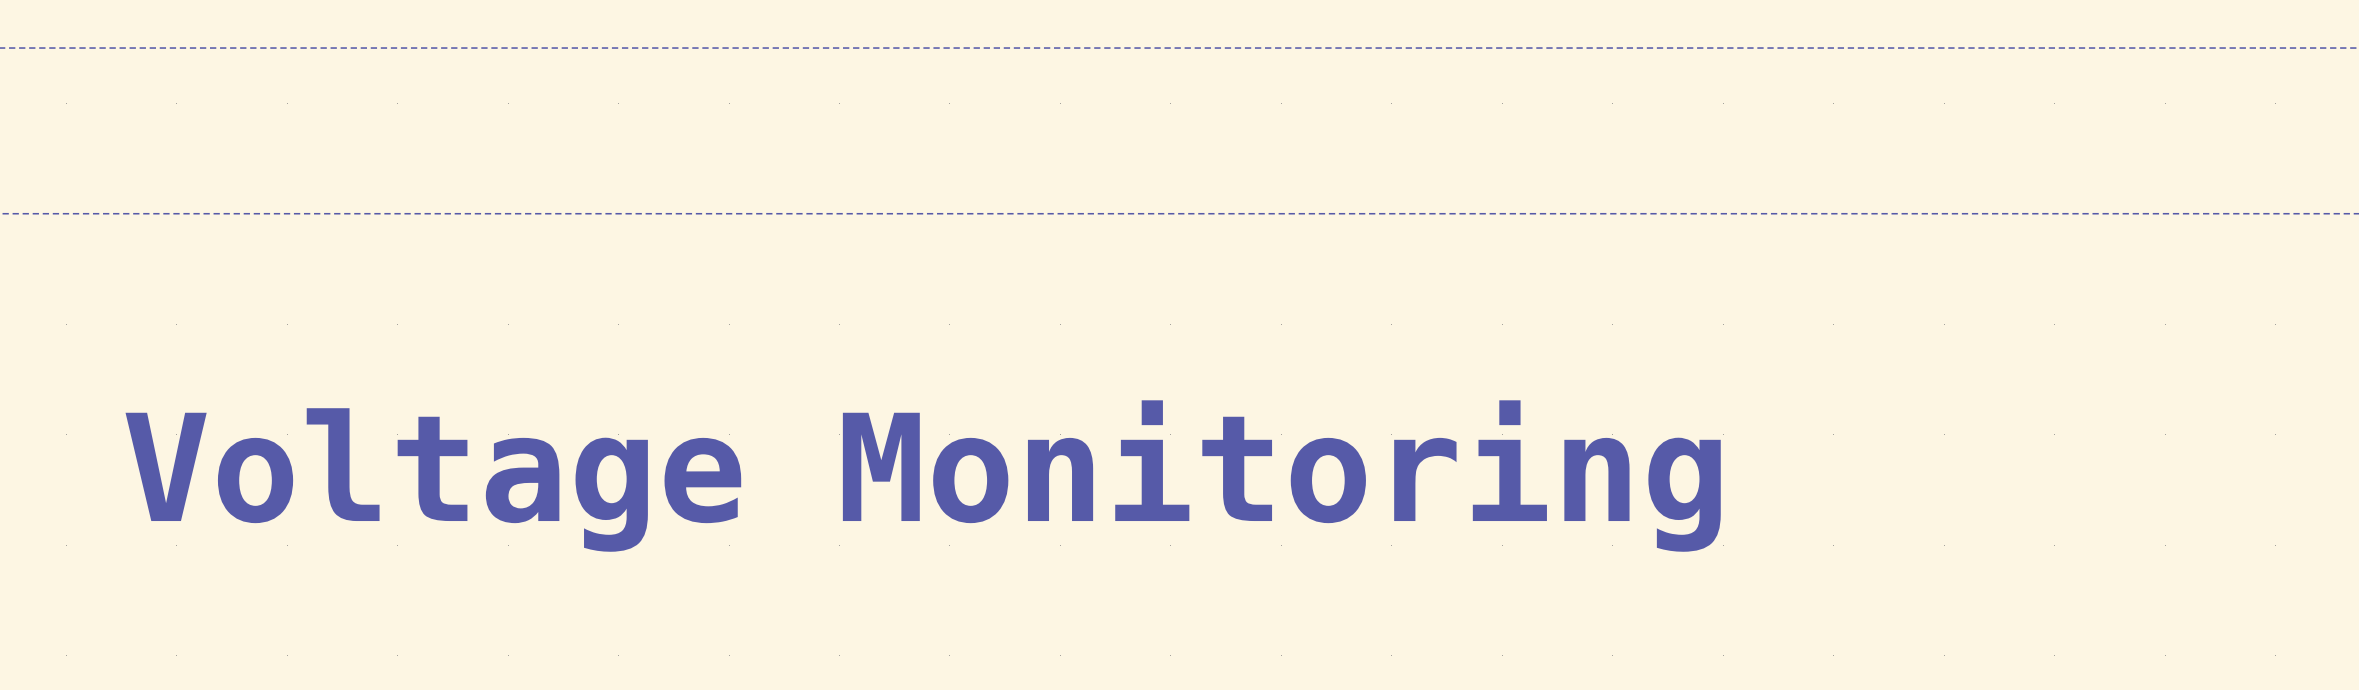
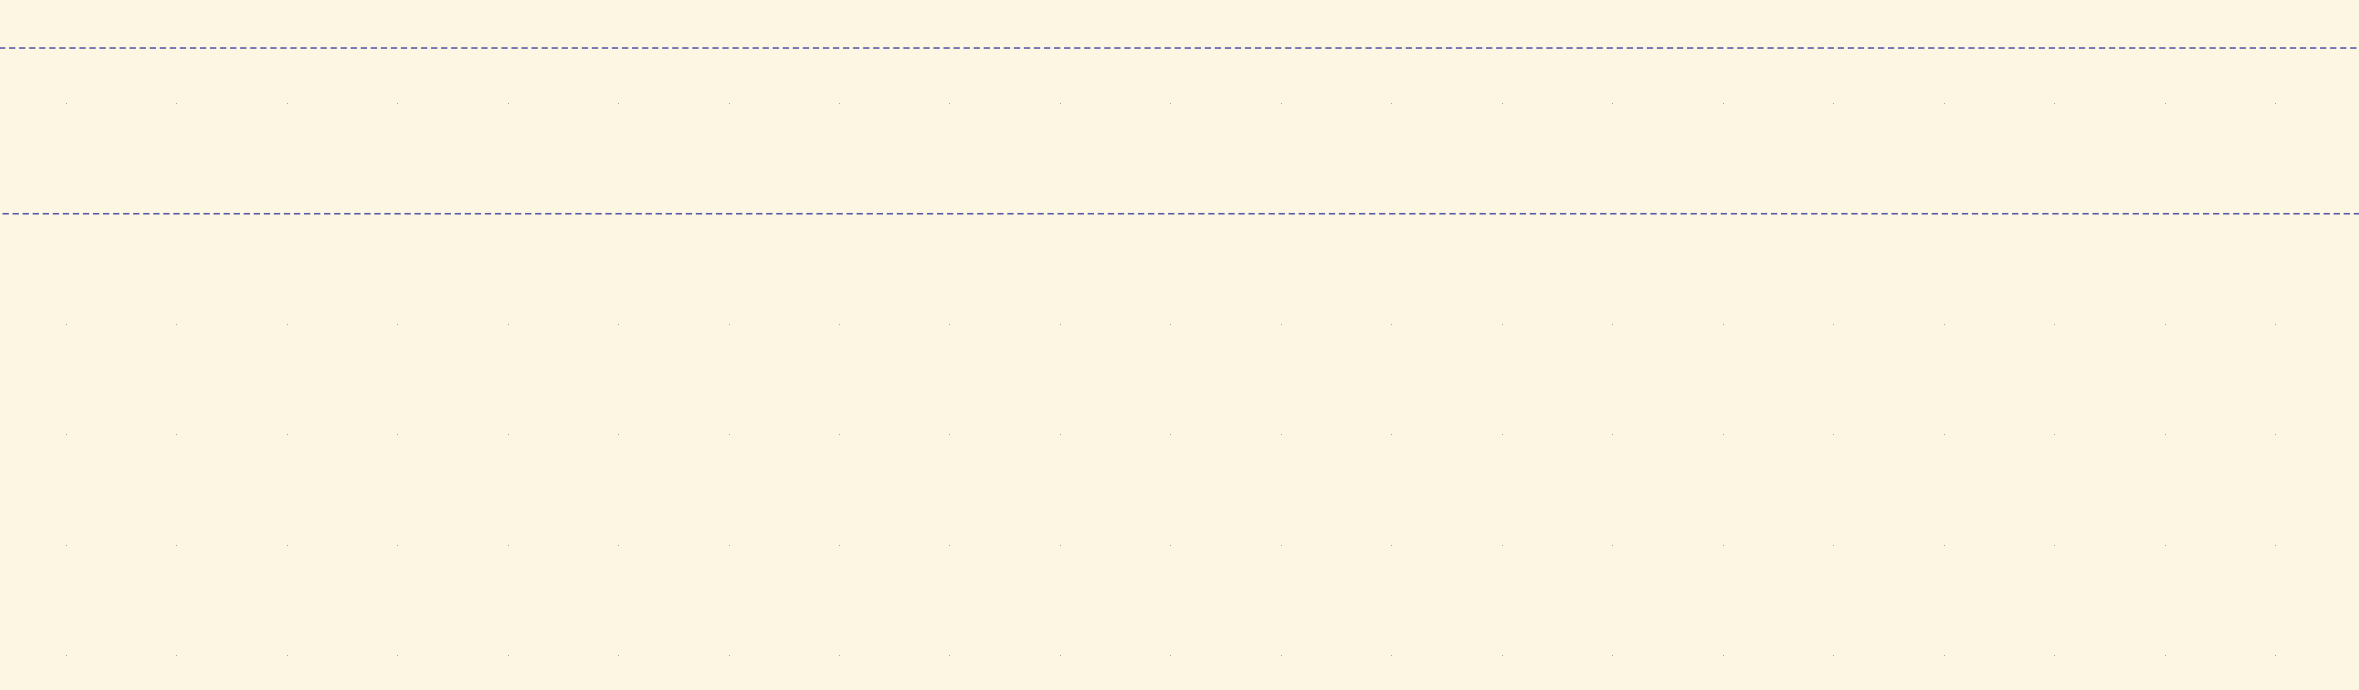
text: Voltage Monitoring (923, 476) -> none

